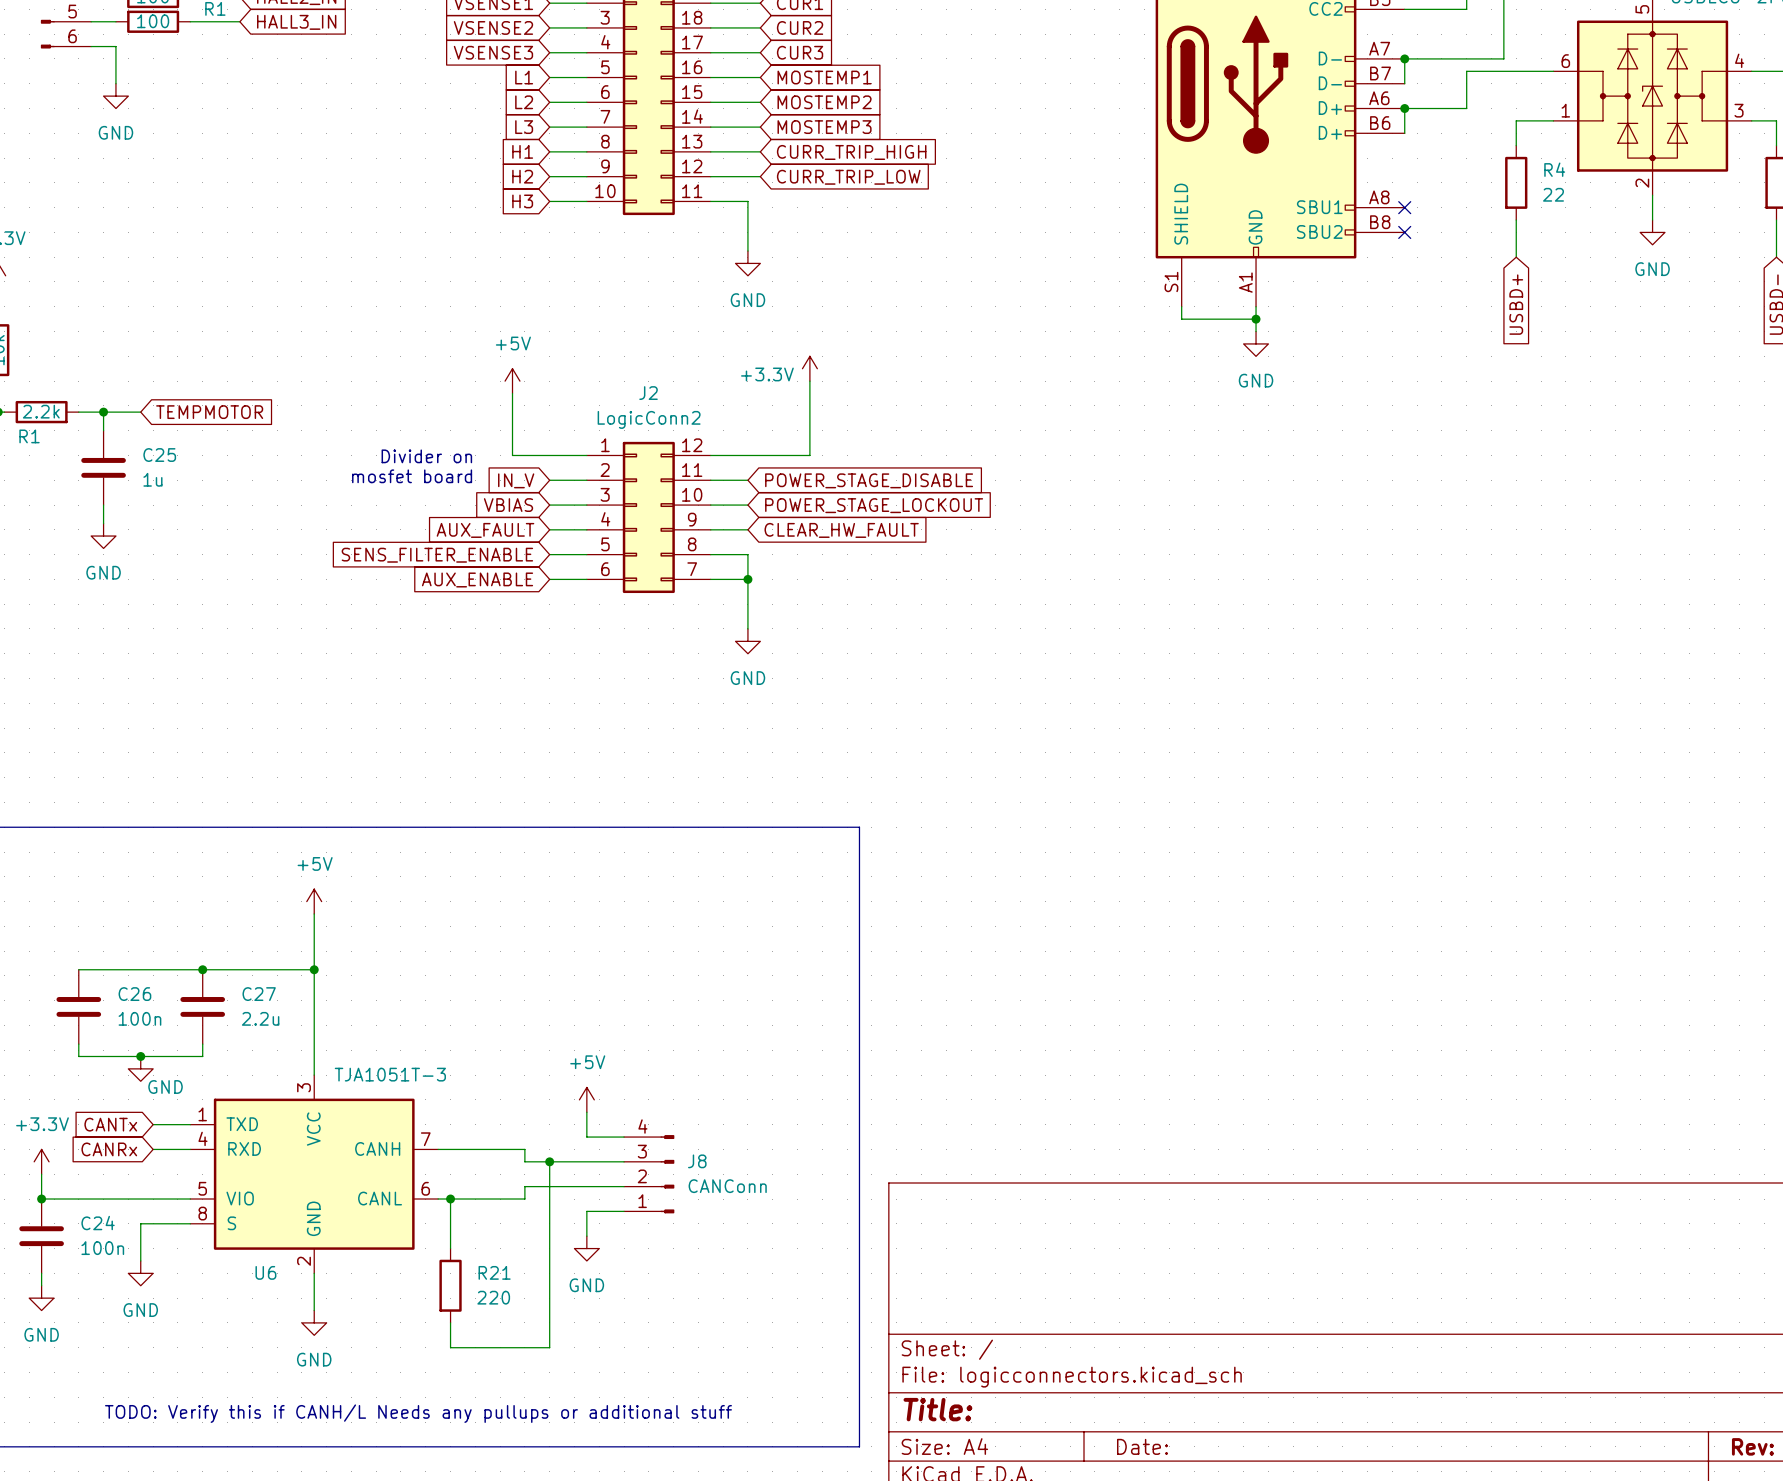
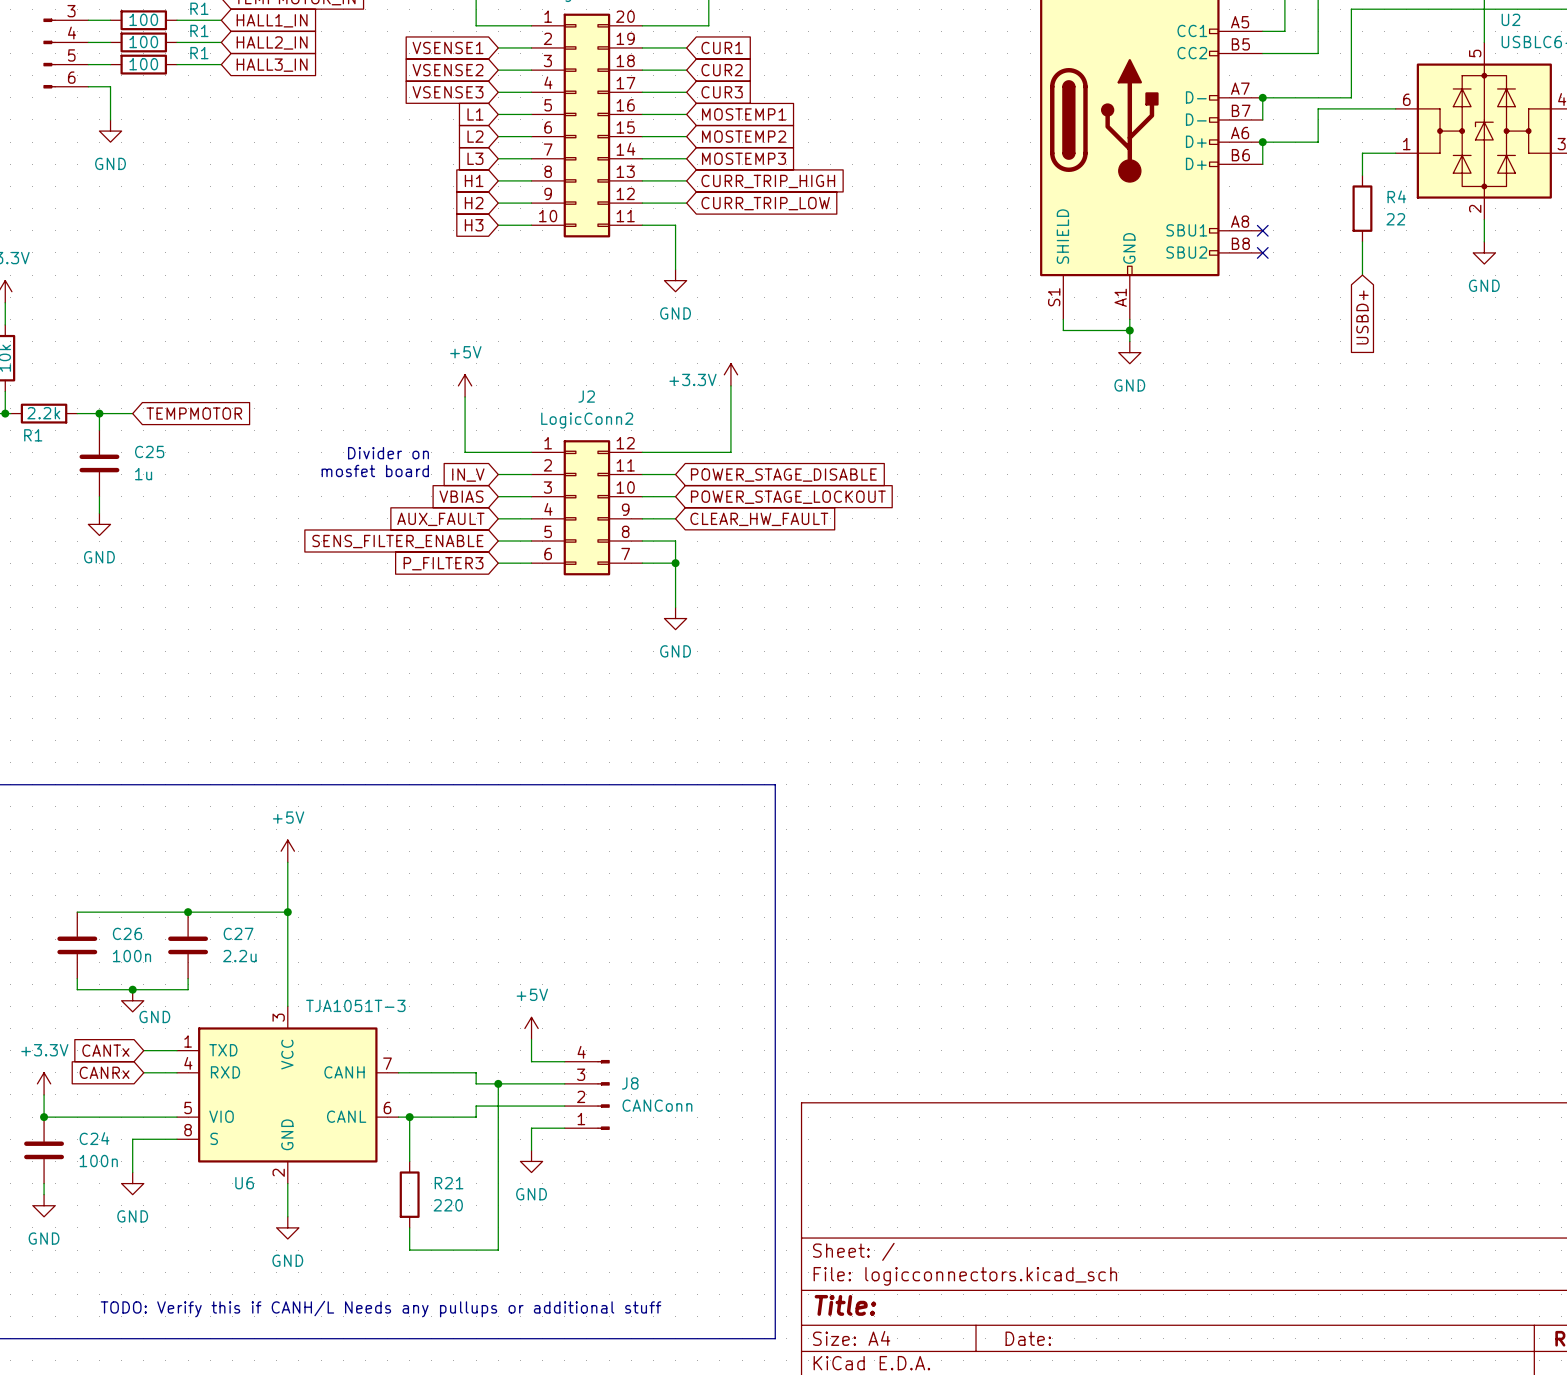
global label: AUX_ENABLE (477, 579) -> P_FILTER3 (443, 563)

